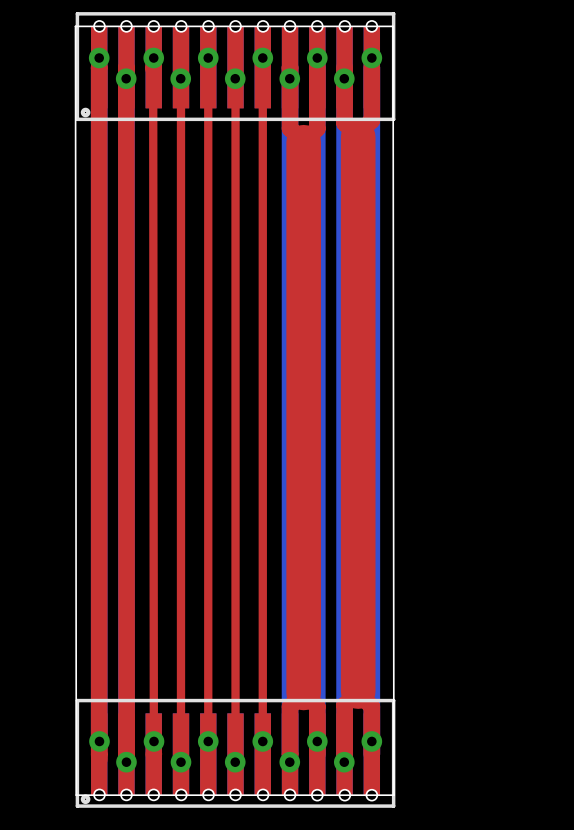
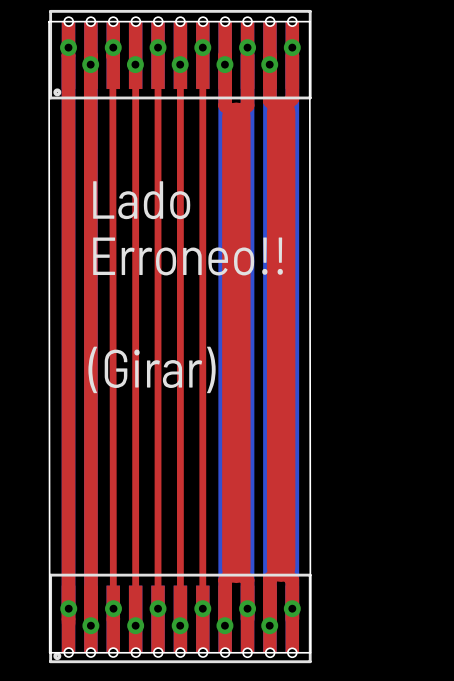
text: none -> Lado (141, 200)
text: none -> Erroneo!! (188, 256)
text: none -> (Girar) (152, 369)

